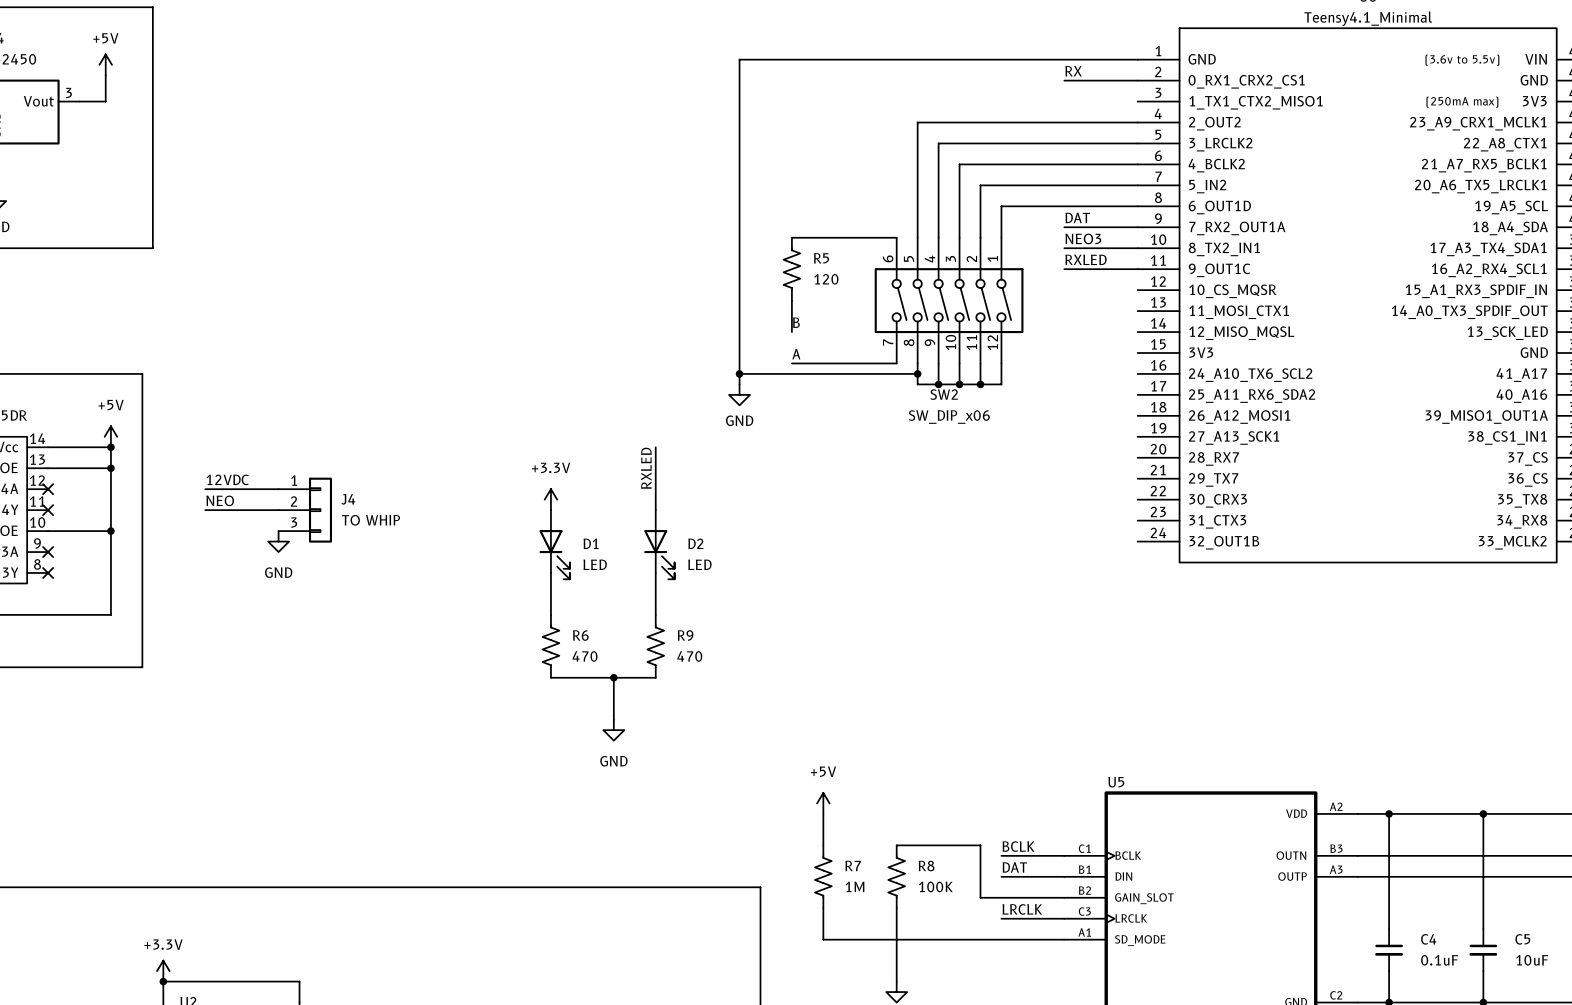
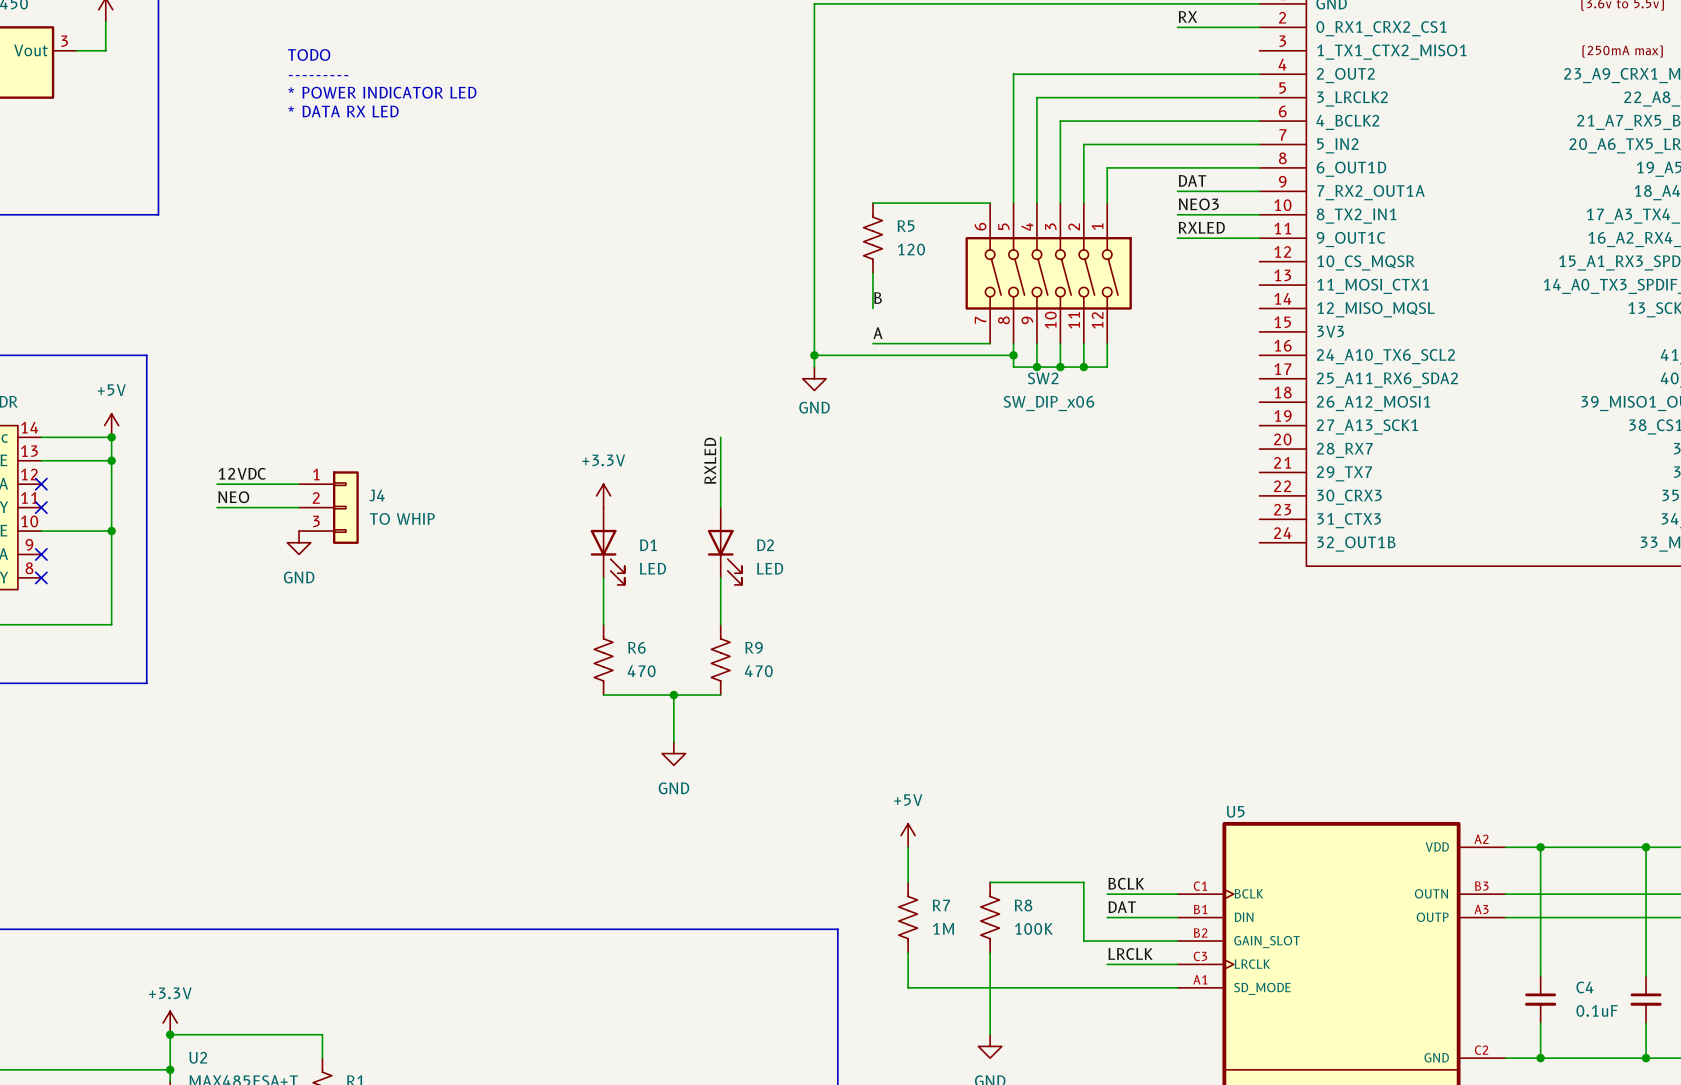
text: none -> TODO (309, 54)
text: none -> --------- (318, 75)
text: none -> * POWER INDICATOR LED (382, 92)
text: none -> * DATA RX LED (343, 111)

